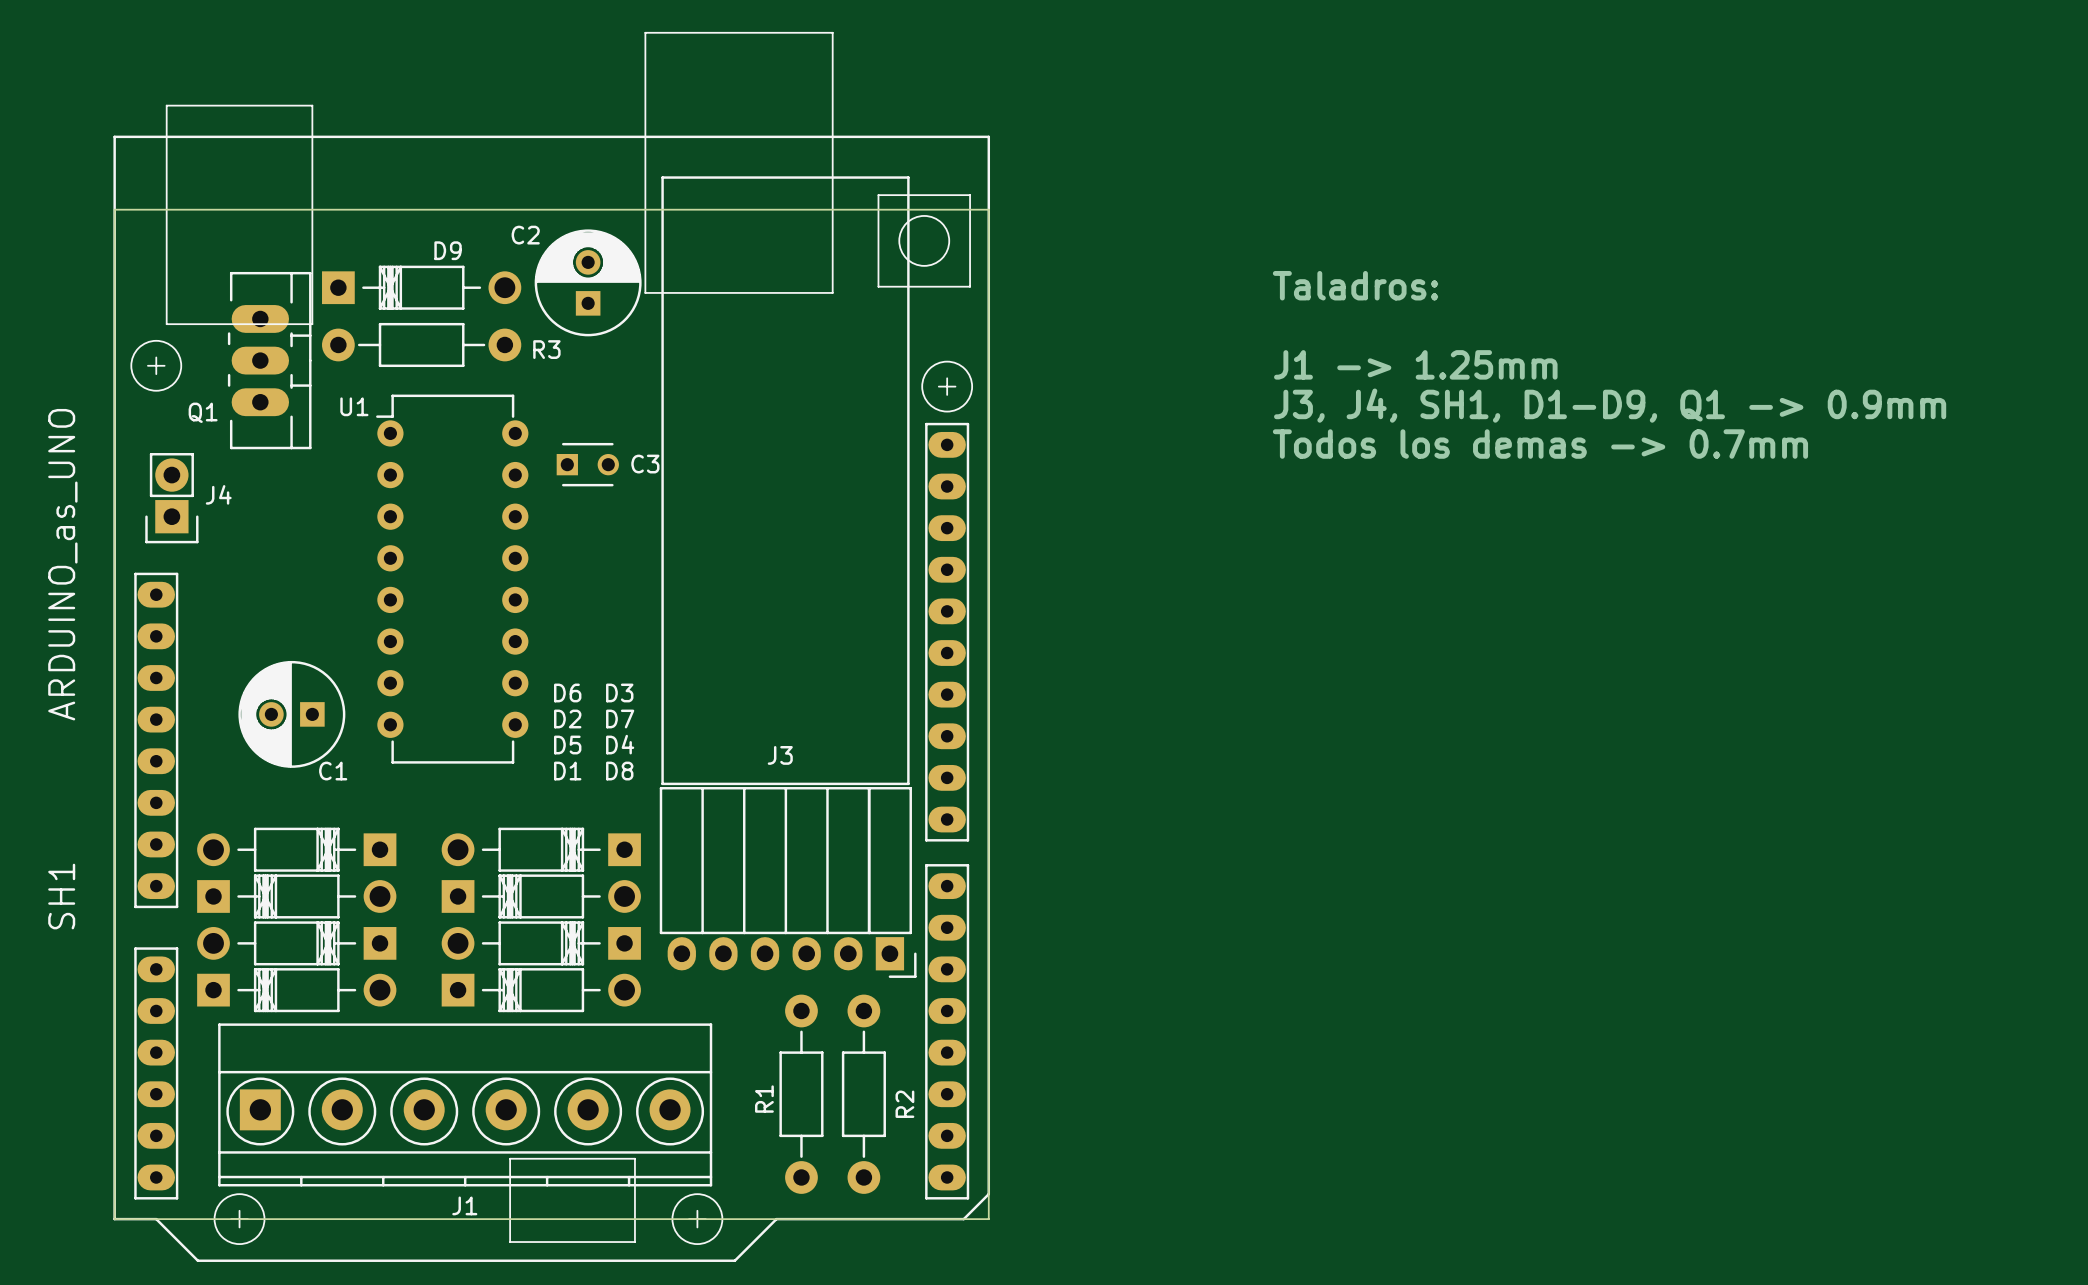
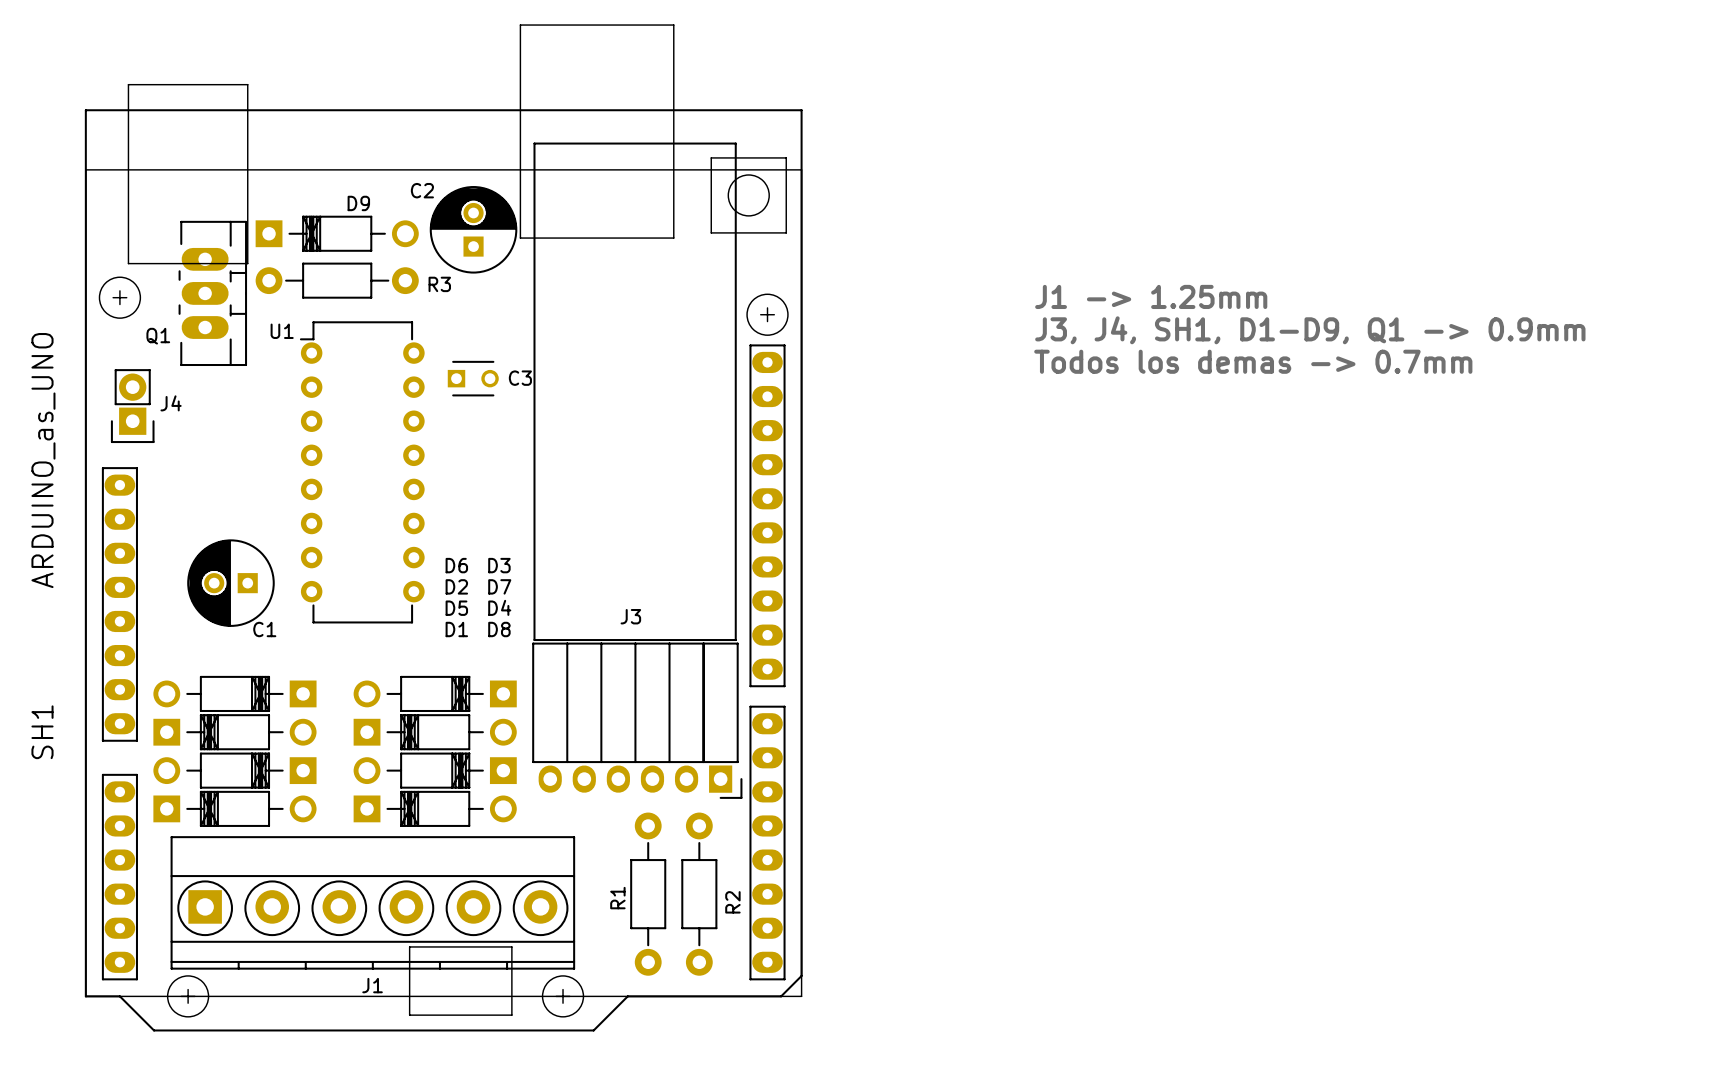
text: Taladros: (1355, 285) -> none

